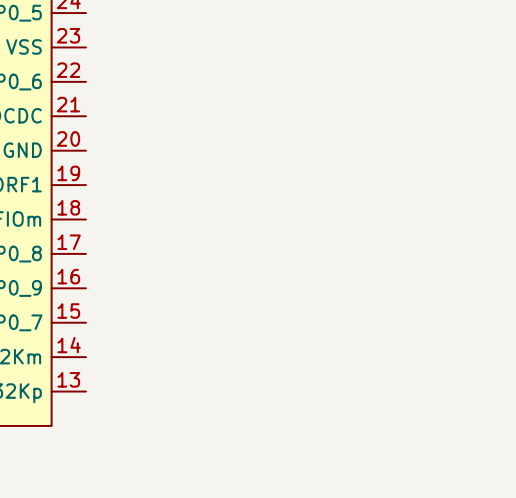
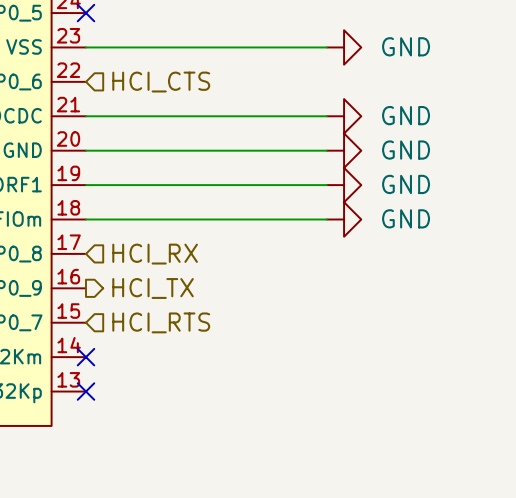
no-connect mark: none -> (86, 13)
wire: none -> (86, 47) (326, 47)
power symbol: none -> GND (344, 47)
hierarchical label: none -> HCI_CTS (161, 82)
wire: none -> (86, 116) (326, 116)
power symbol: none -> GND (344, 116)
wire: none -> (86, 150) (326, 150)
power symbol: none -> GND (344, 150)
wire: none -> (86, 185) (326, 185)
power symbol: none -> GND (344, 185)
wire: none -> (86, 219) (326, 219)
power symbol: none -> GND (344, 219)
hierarchical label: none -> HCI_RX (155, 254)
hierarchical label: none -> HCI_TX (153, 288)
hierarchical label: none -> HCI_RTS (161, 322)
no-connect mark: none -> (86, 357)
no-connect mark: none -> (86, 391)

